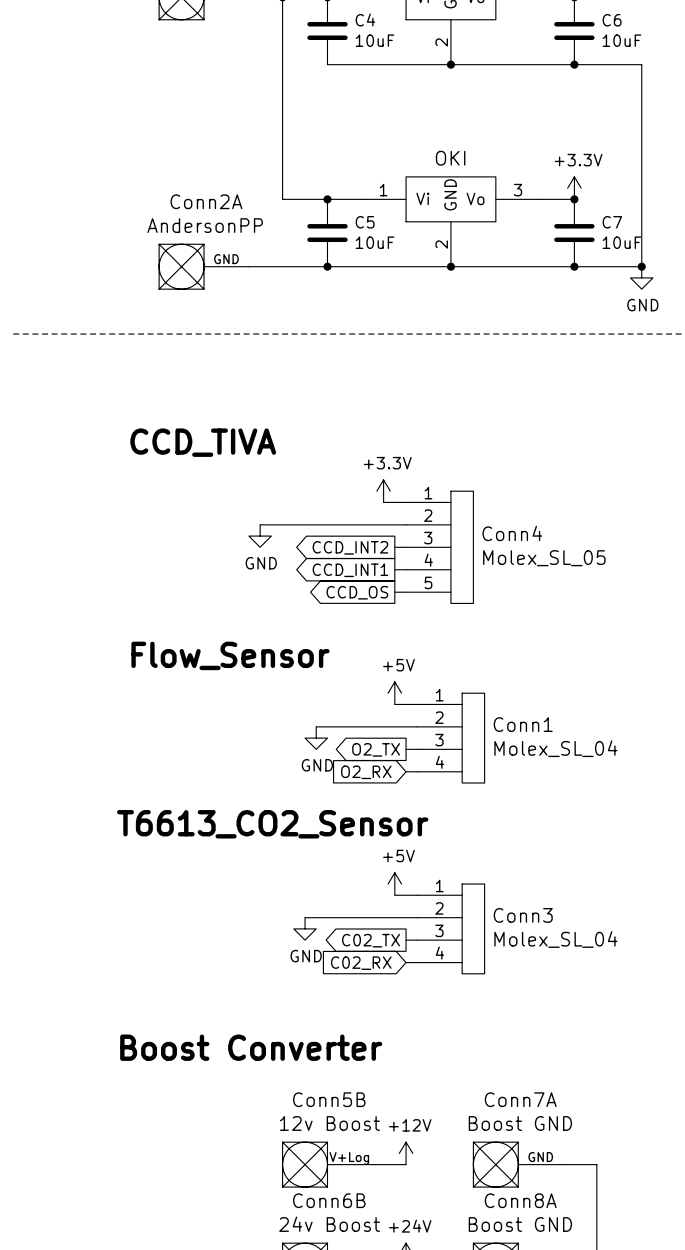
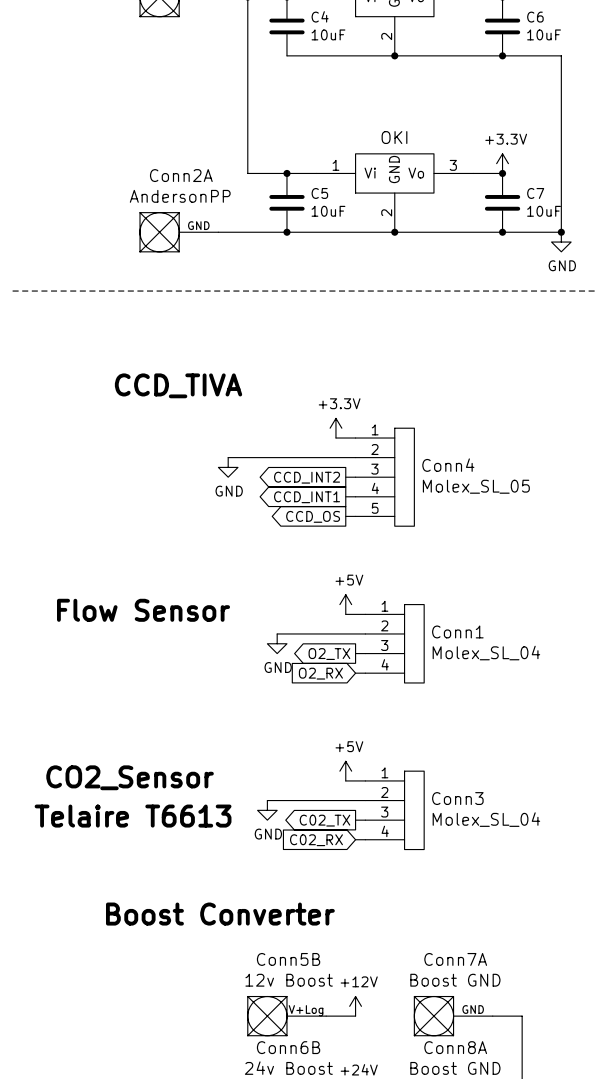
text: Flow_Sensor (230, 655) -> Flow Sensor (143, 610)
text: T6613_CO2_Sensor (272, 824) -> none
text: none -> CO2_Sensor (130, 777)
text: none -> Telaire T6613 (133, 816)

